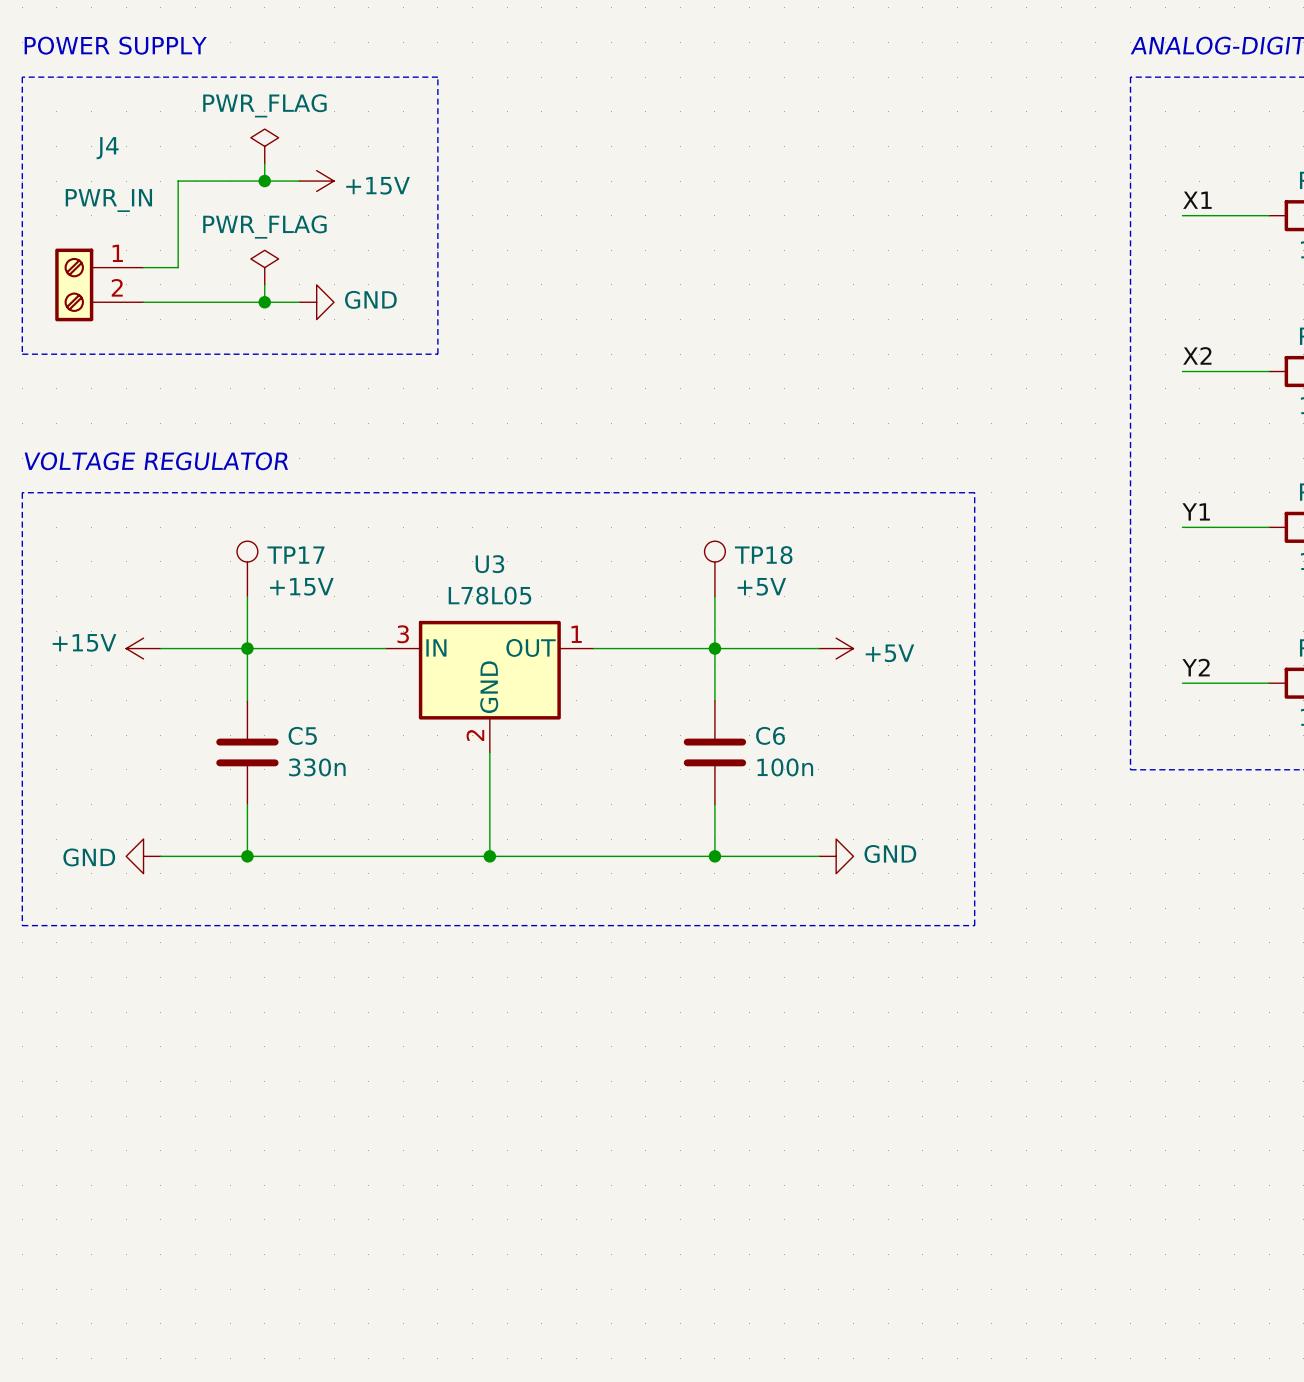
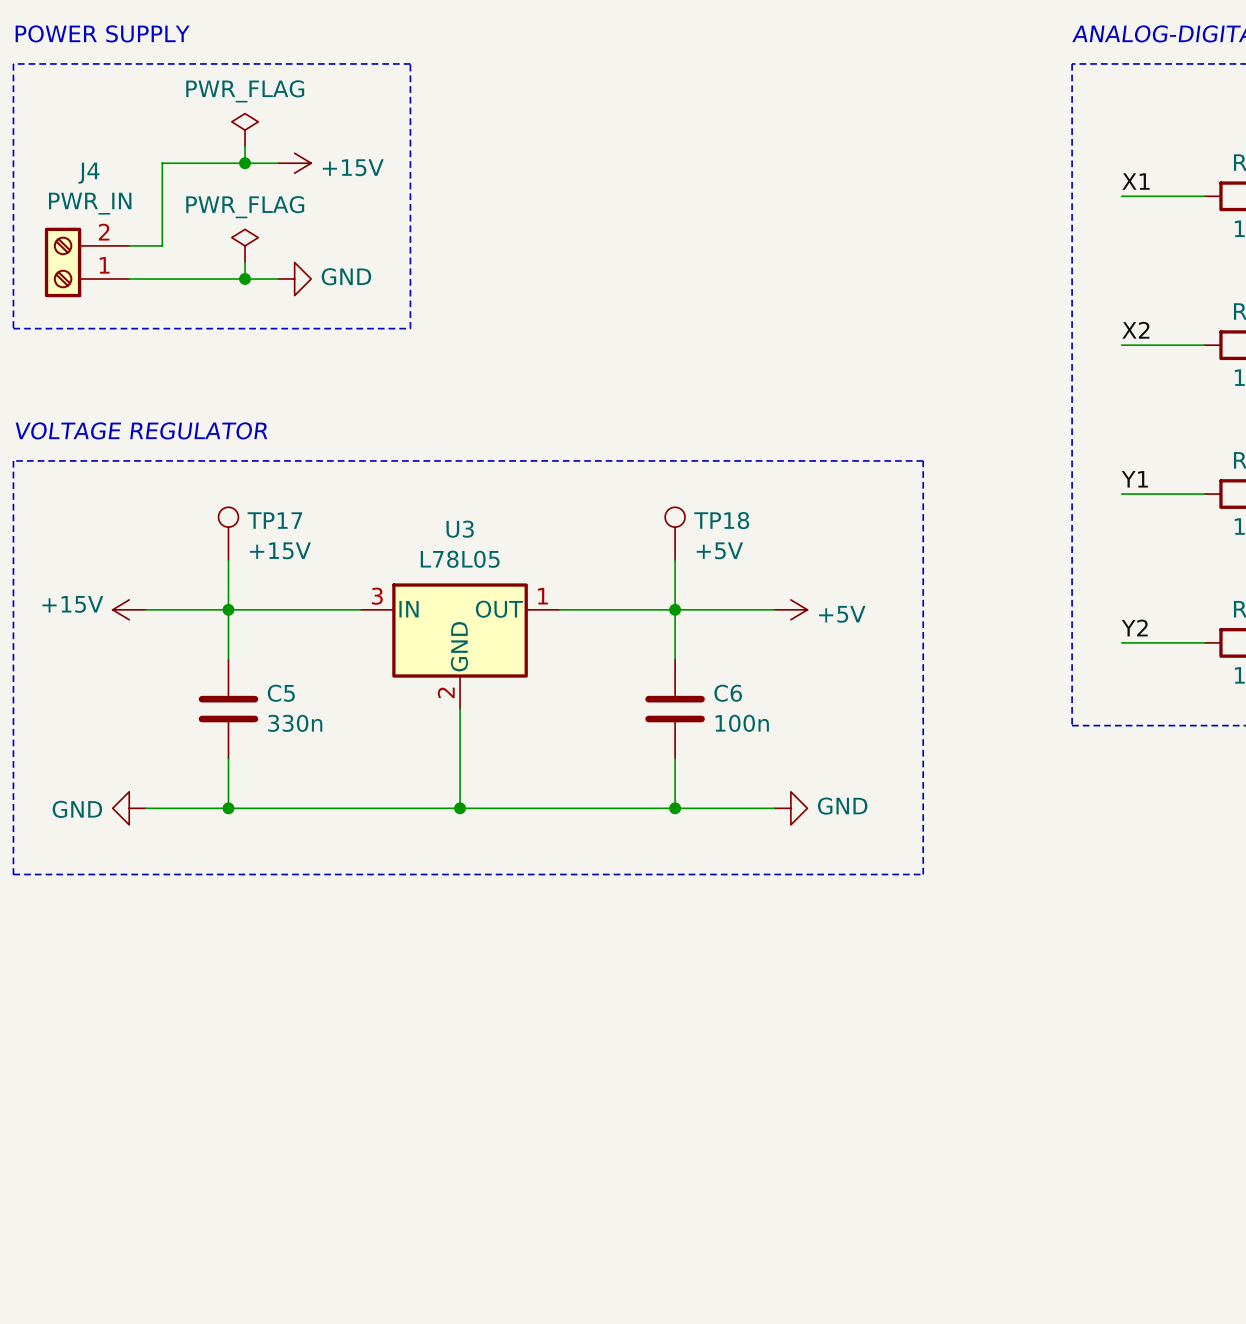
J4 name position: J4 (107, 148) -> J4 (88, 173)
J4 flip: as is (74, 284) -> up-down (63, 262)

